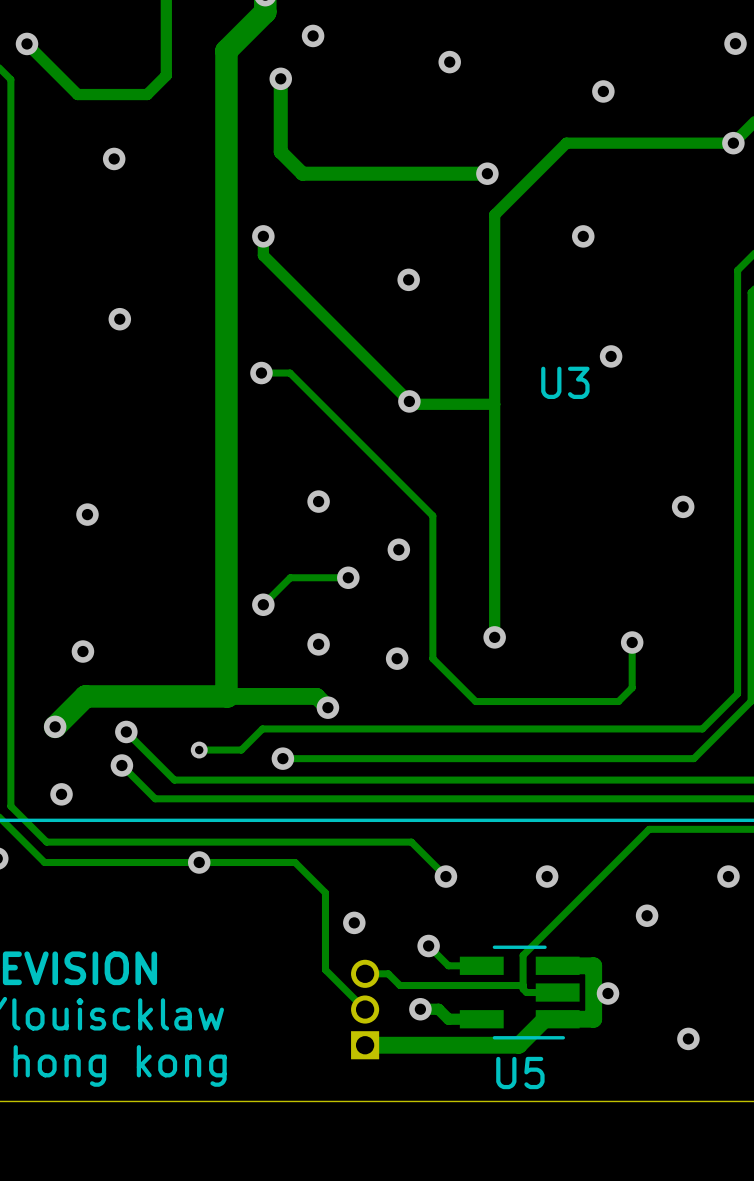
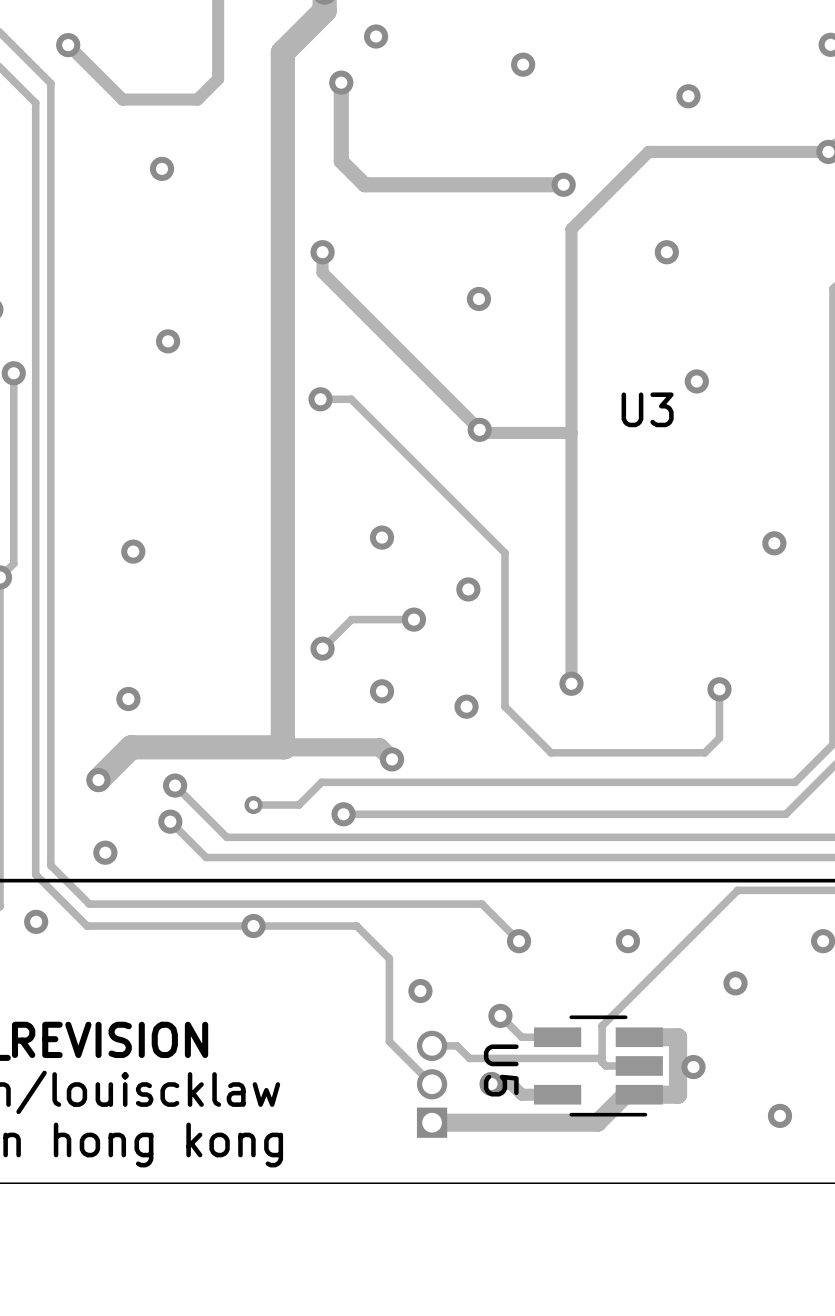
U5 name rotation: 0° (520, 1073) -> 90° clockwise (501, 1070)
U5 name position: U5 (520, 1073) -> U5 (501, 1070)

